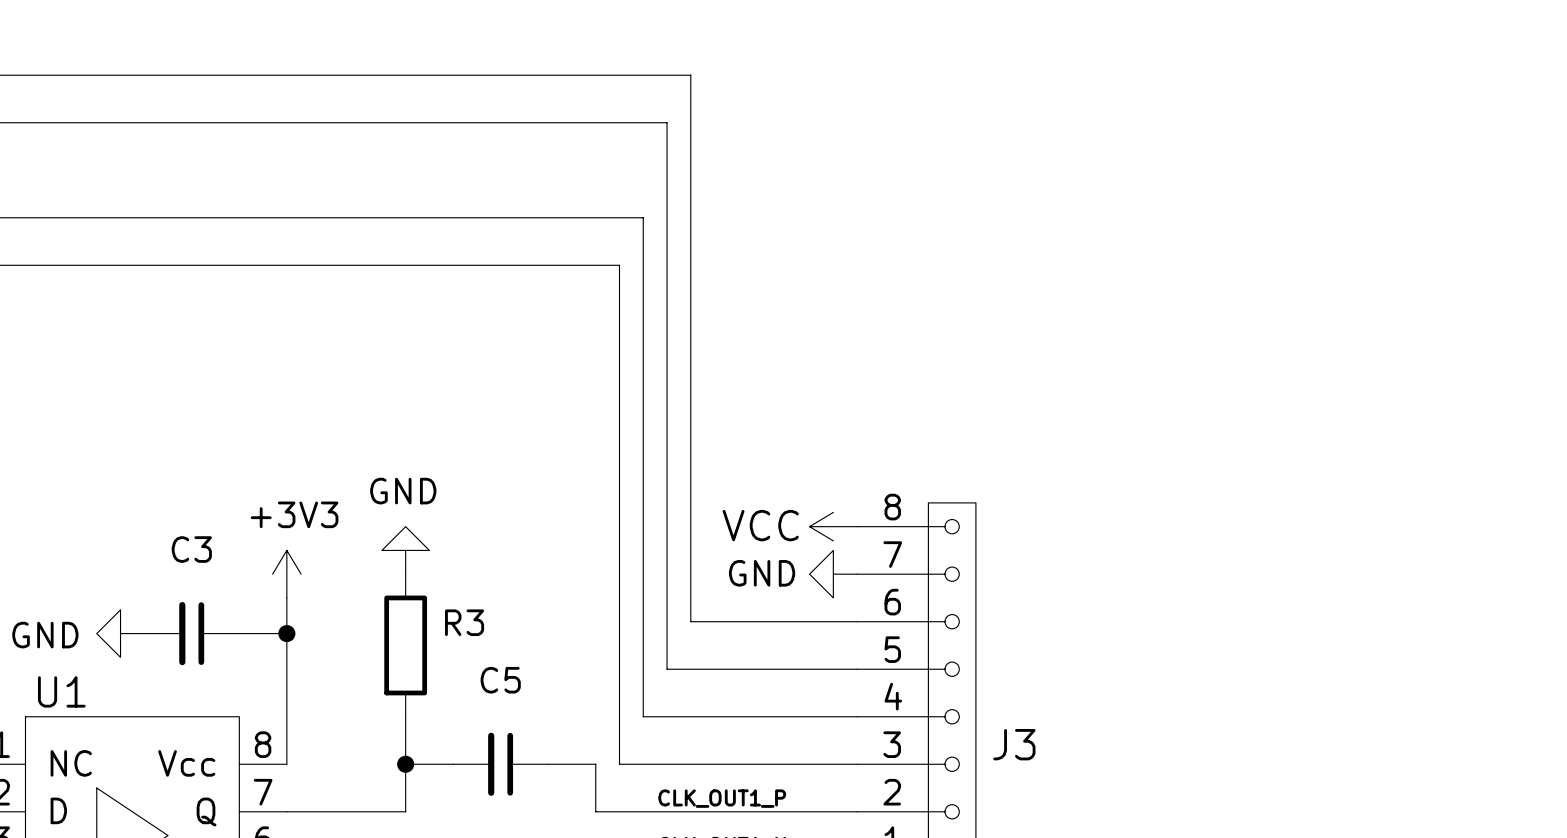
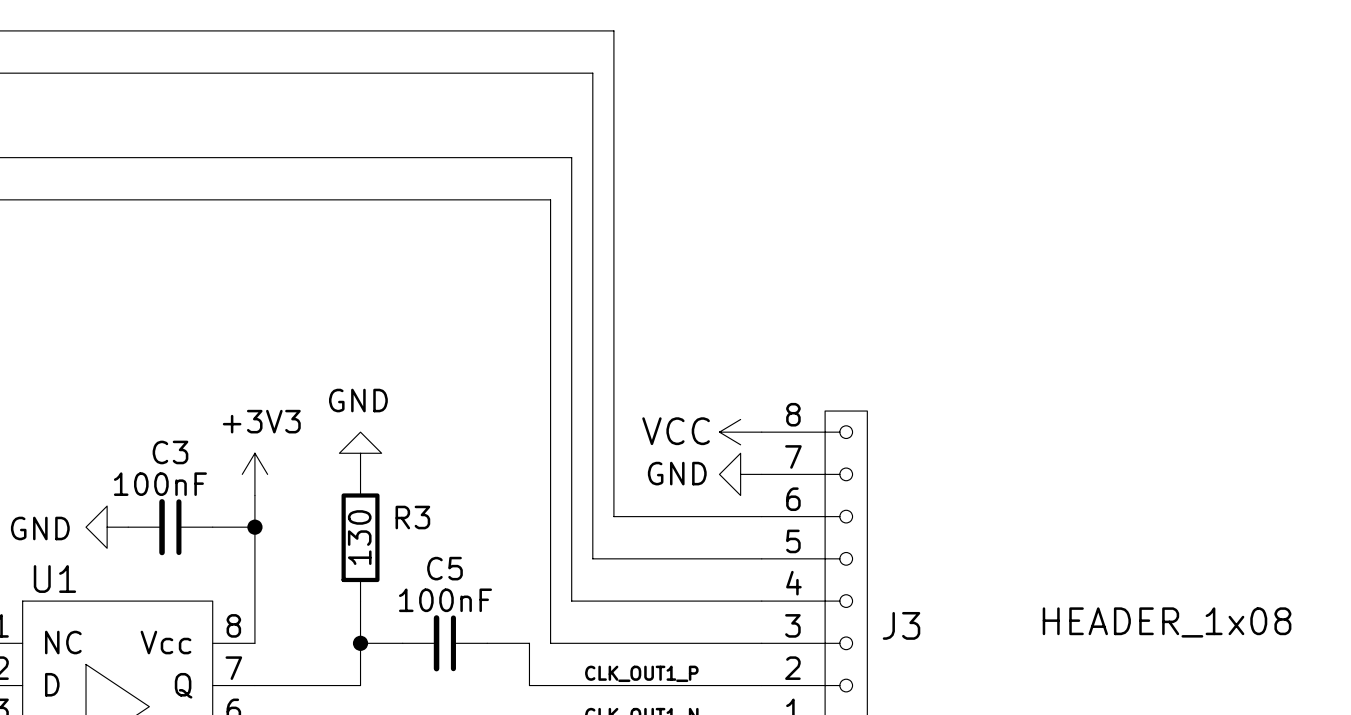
C3 value: none -> 100nF (160, 484)
R3 value: none -> 130 (359, 537)
C5 value: none -> 100nF (445, 600)
J3 value: none -> HEADER_1x08 (1167, 622)

